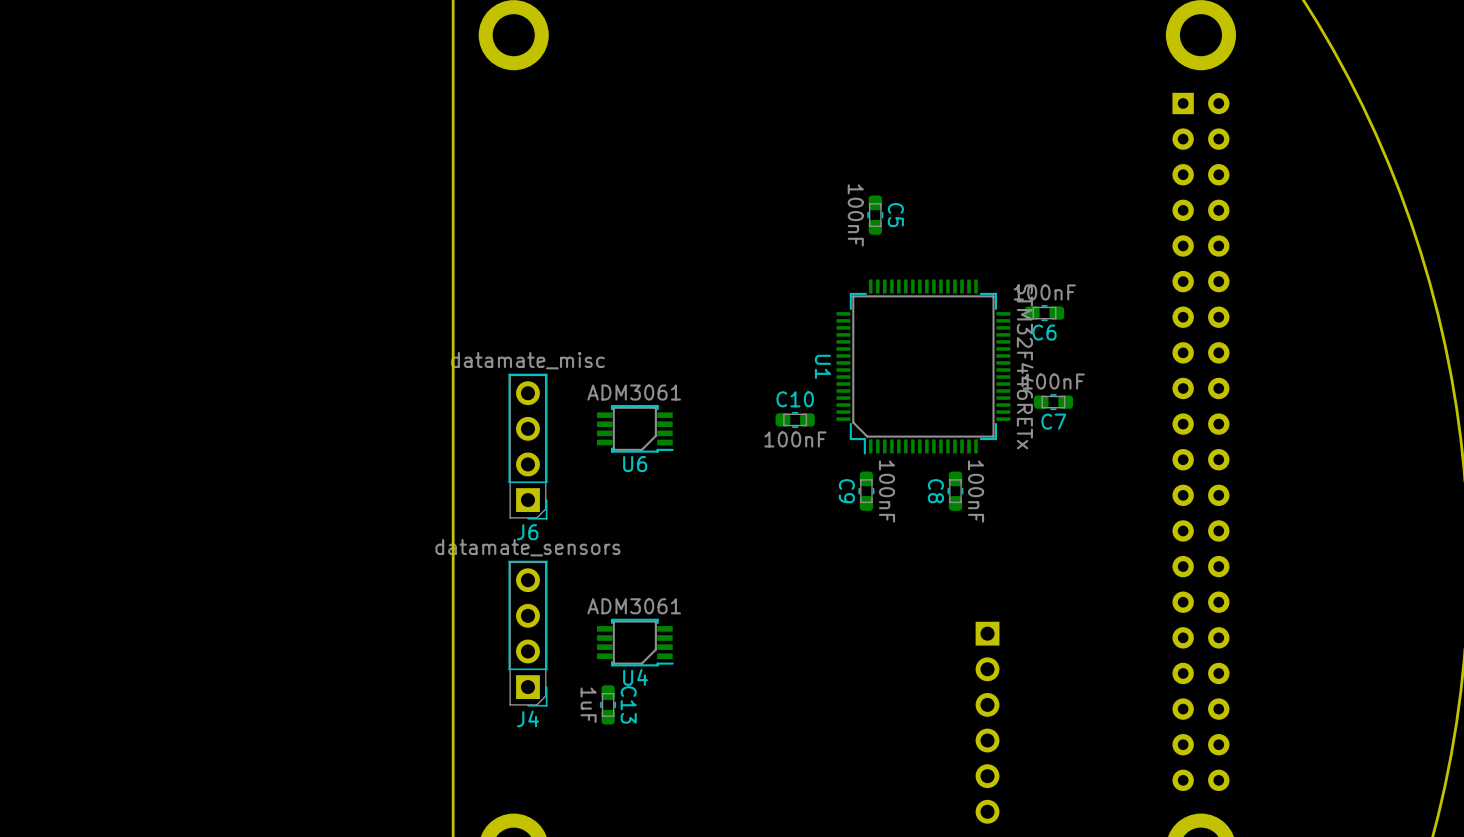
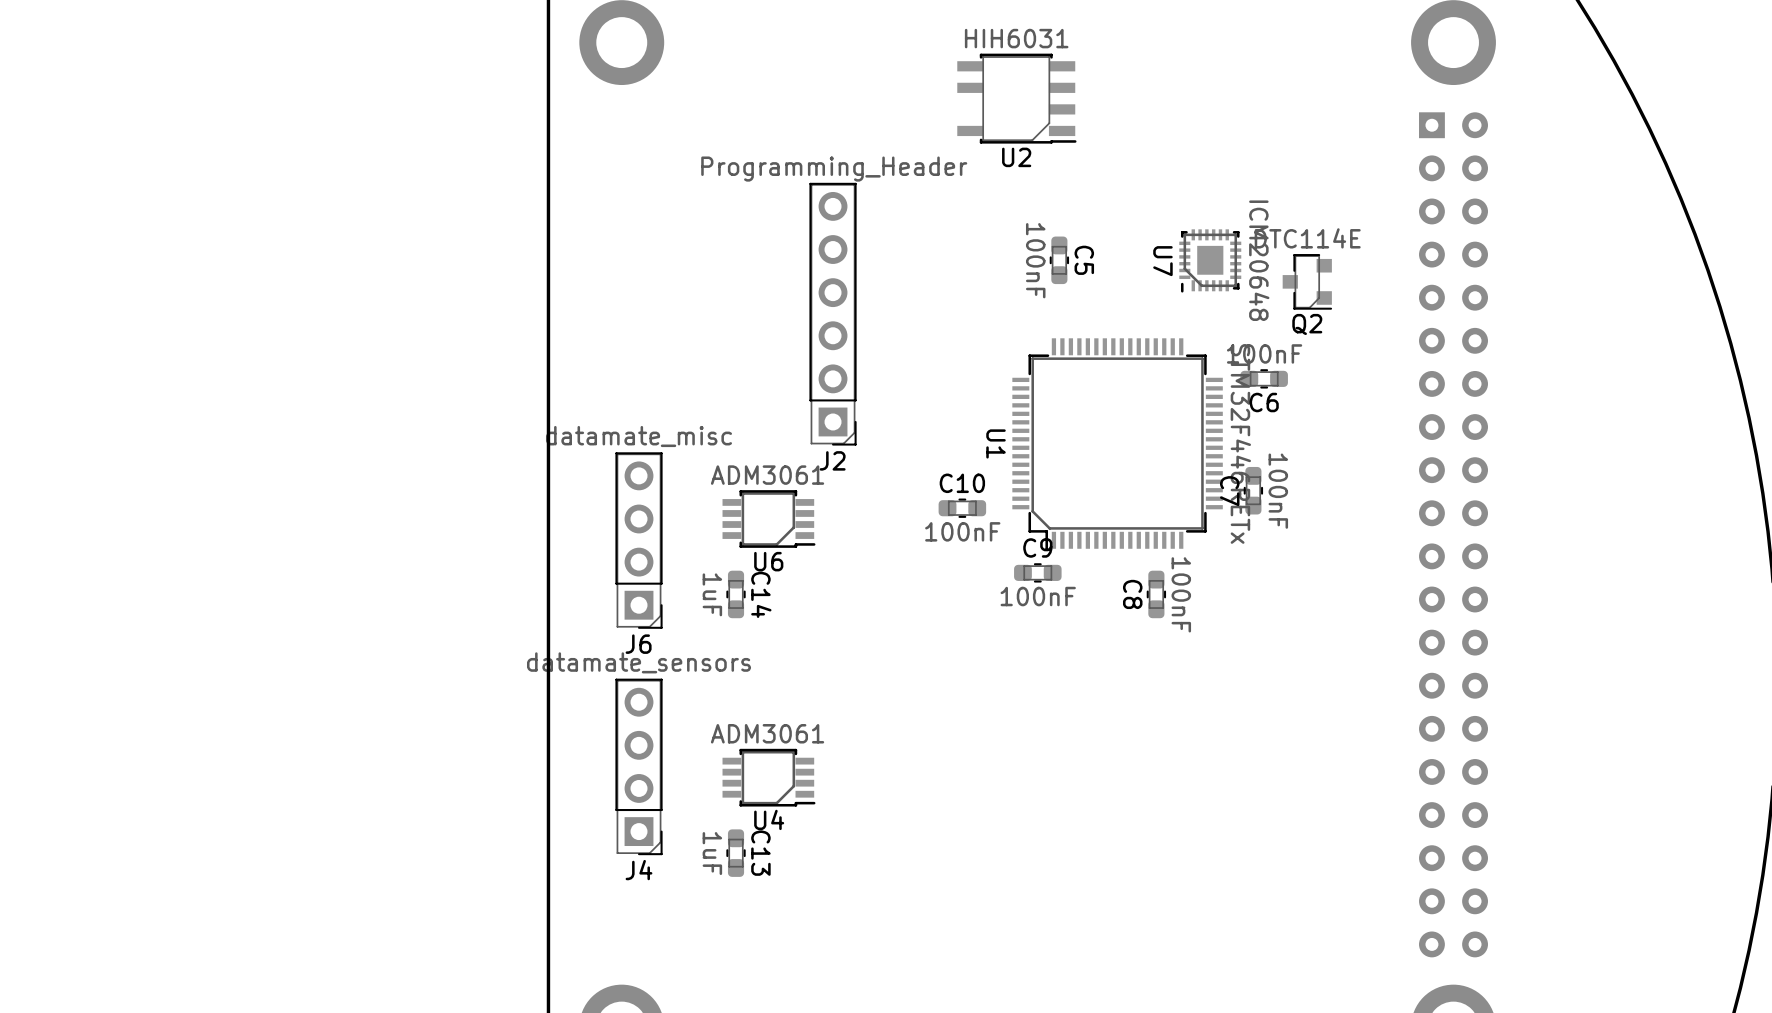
U2: none -> HIH6031 (1016, 98)
U7: none -> ICM20648 (1210, 260)
Q2: none -> DTC114E (1307, 281)
J2: none -> Programming_Header (833, 314)
C7 rotation: 0° (1053, 402) -> 90° clockwise (1253, 490)
C14: none -> 1uF (736, 594)
C9 rotation: 0° (866, 491) -> 90° clockwise (1037, 572)
part: (987, 722) -> none

